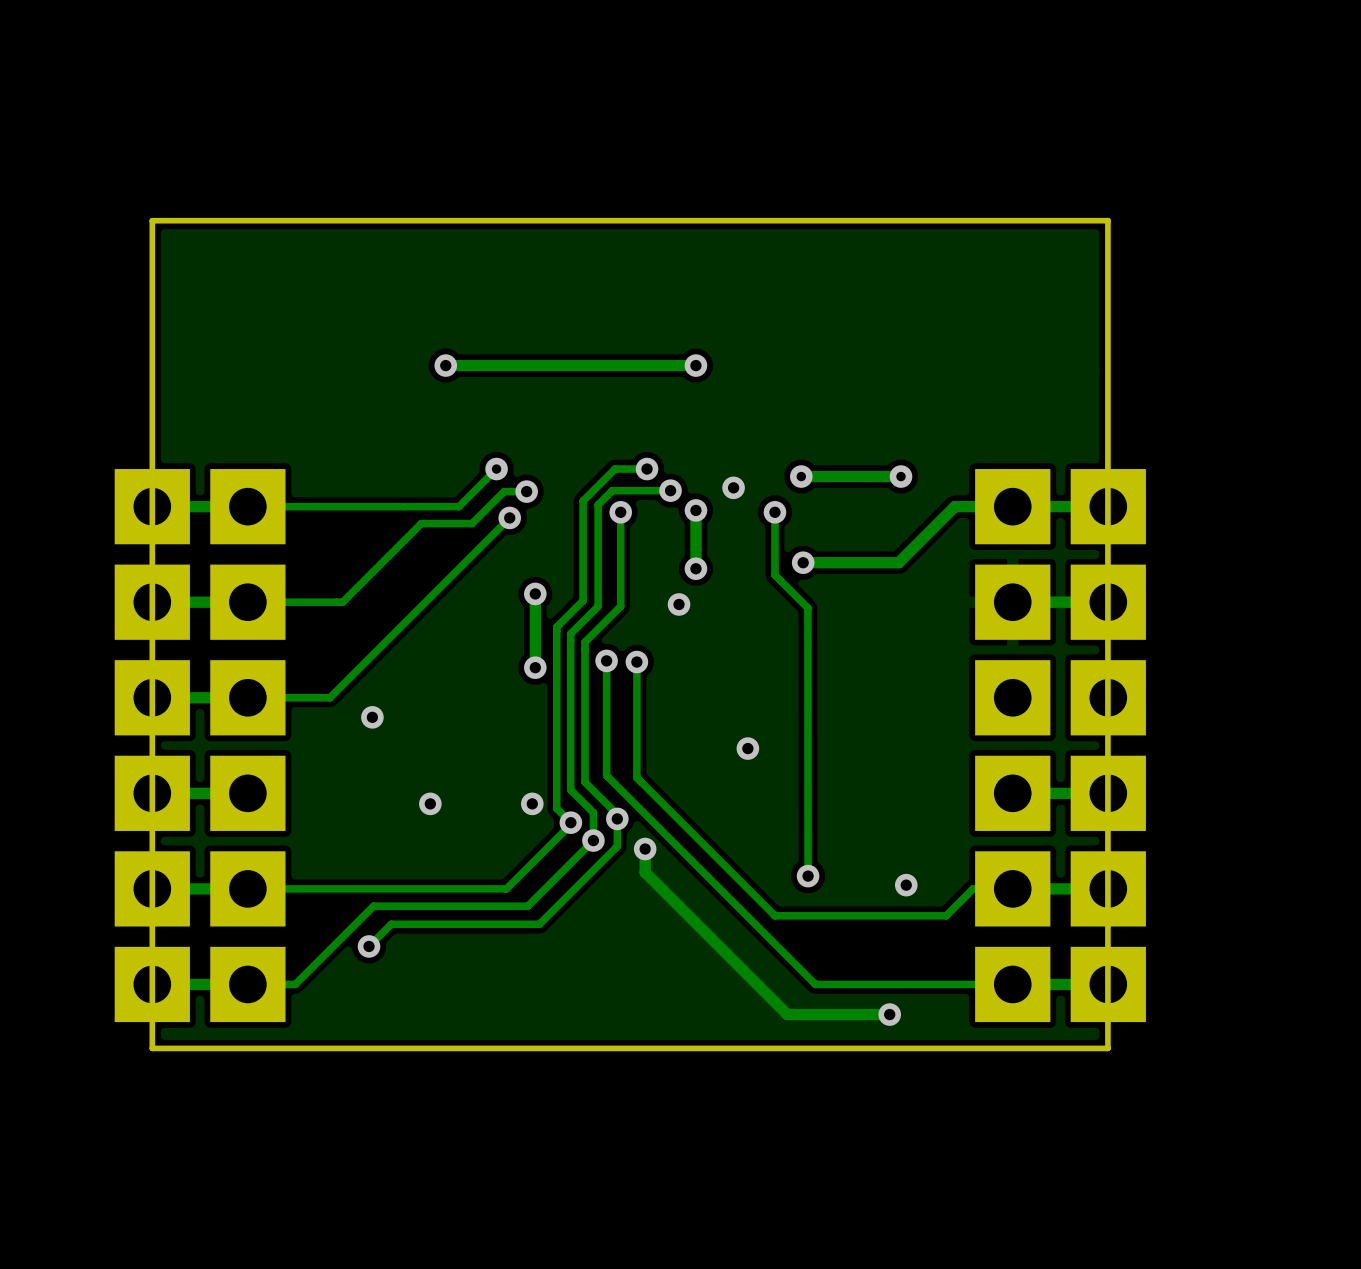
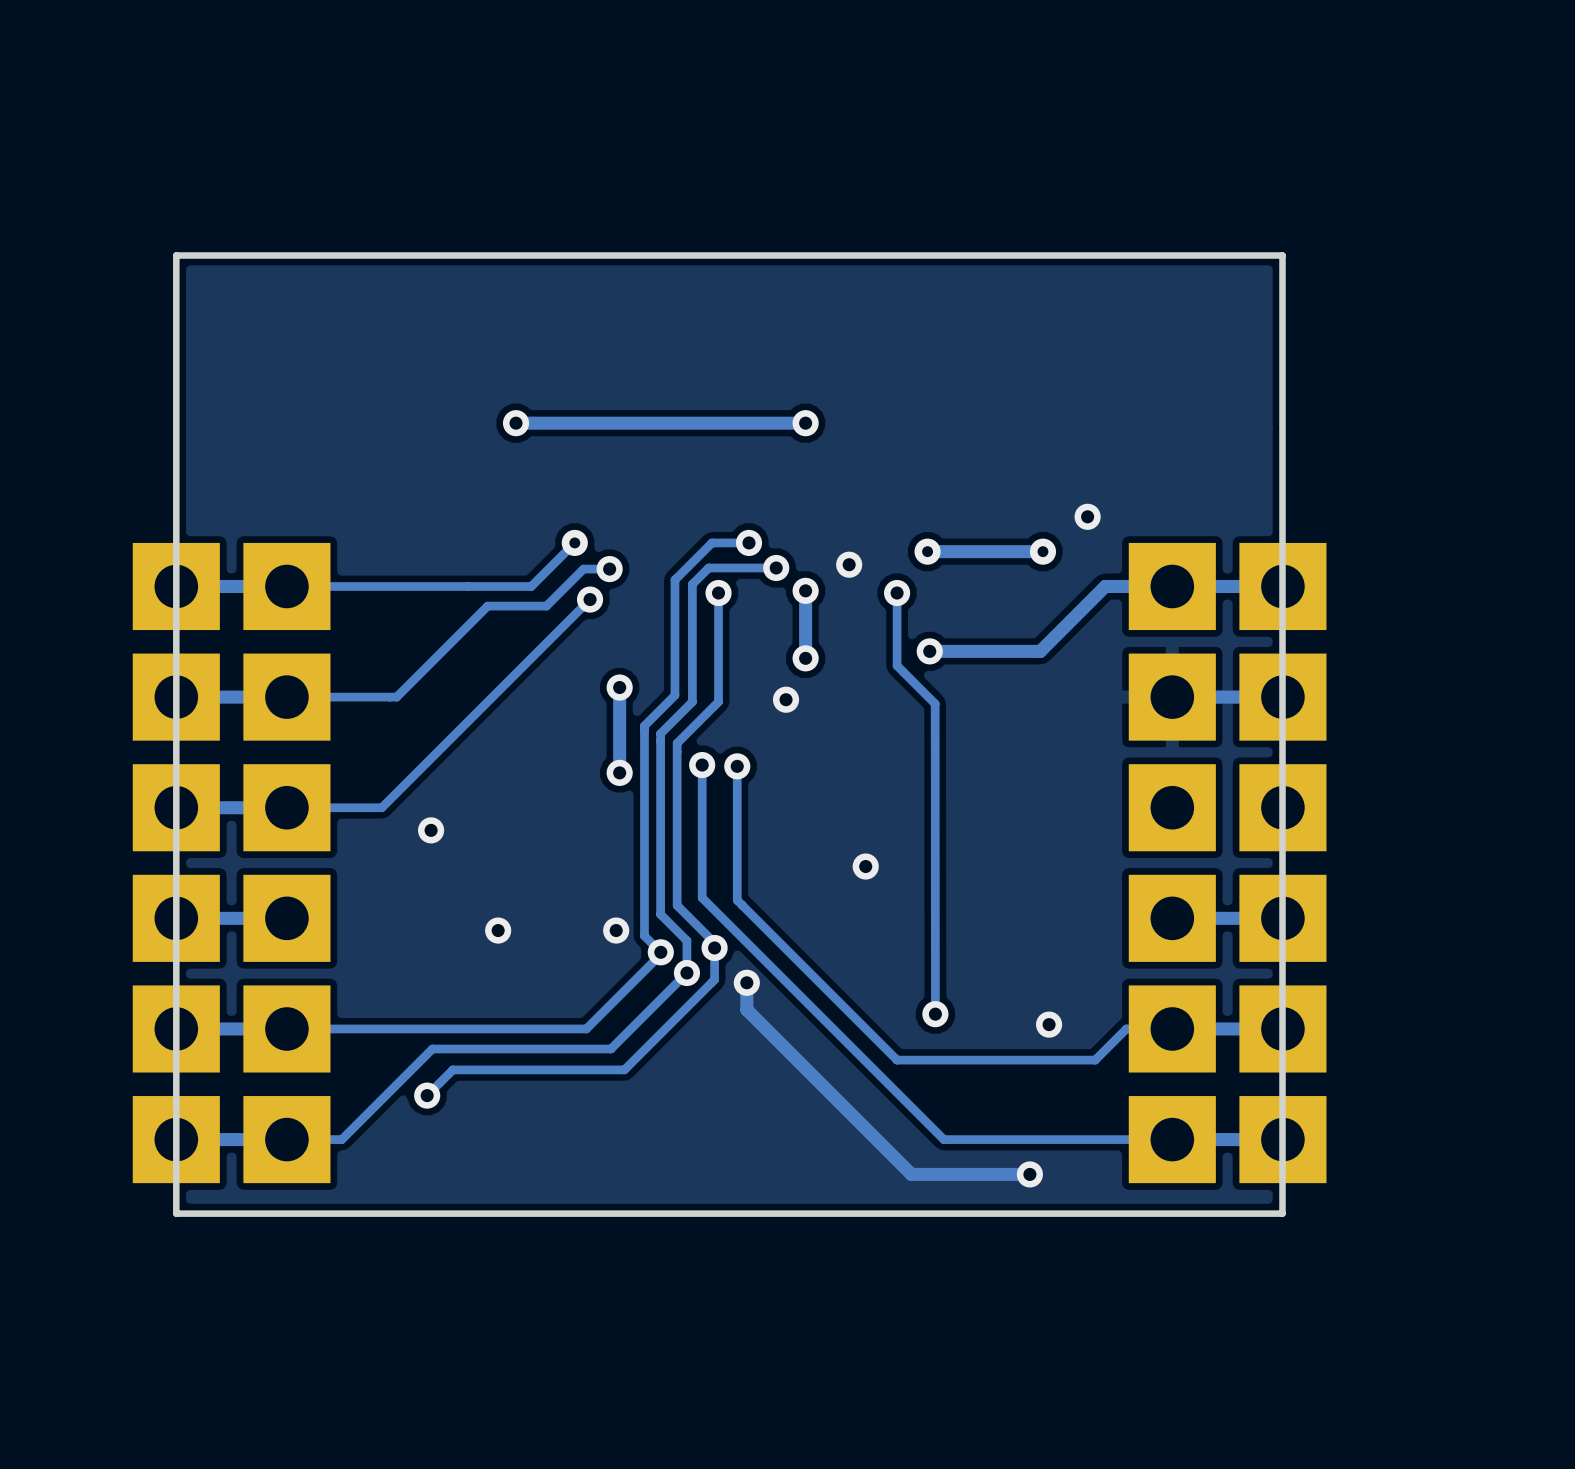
via: none -> (1087, 516)

